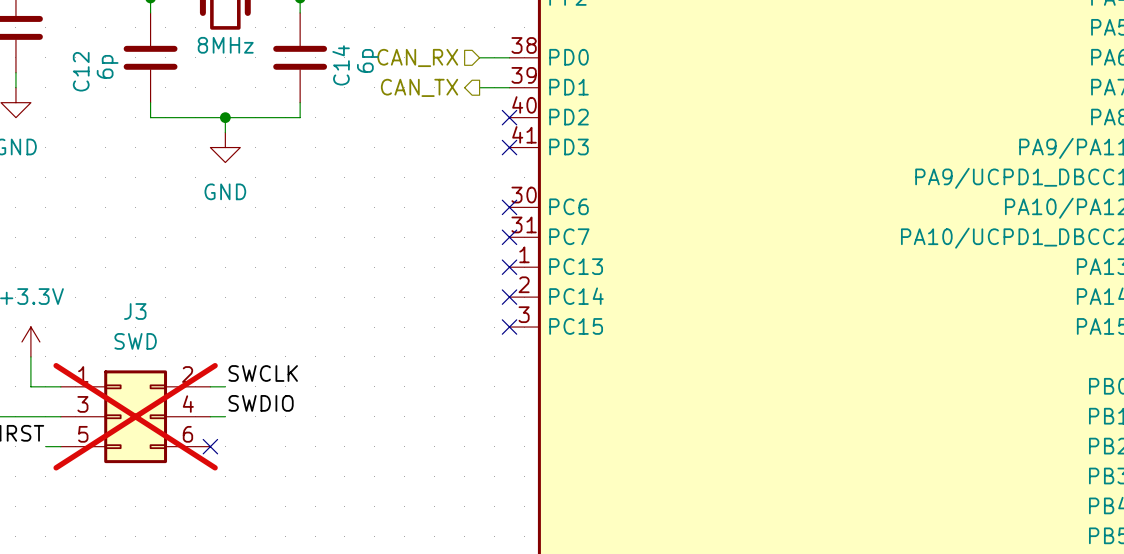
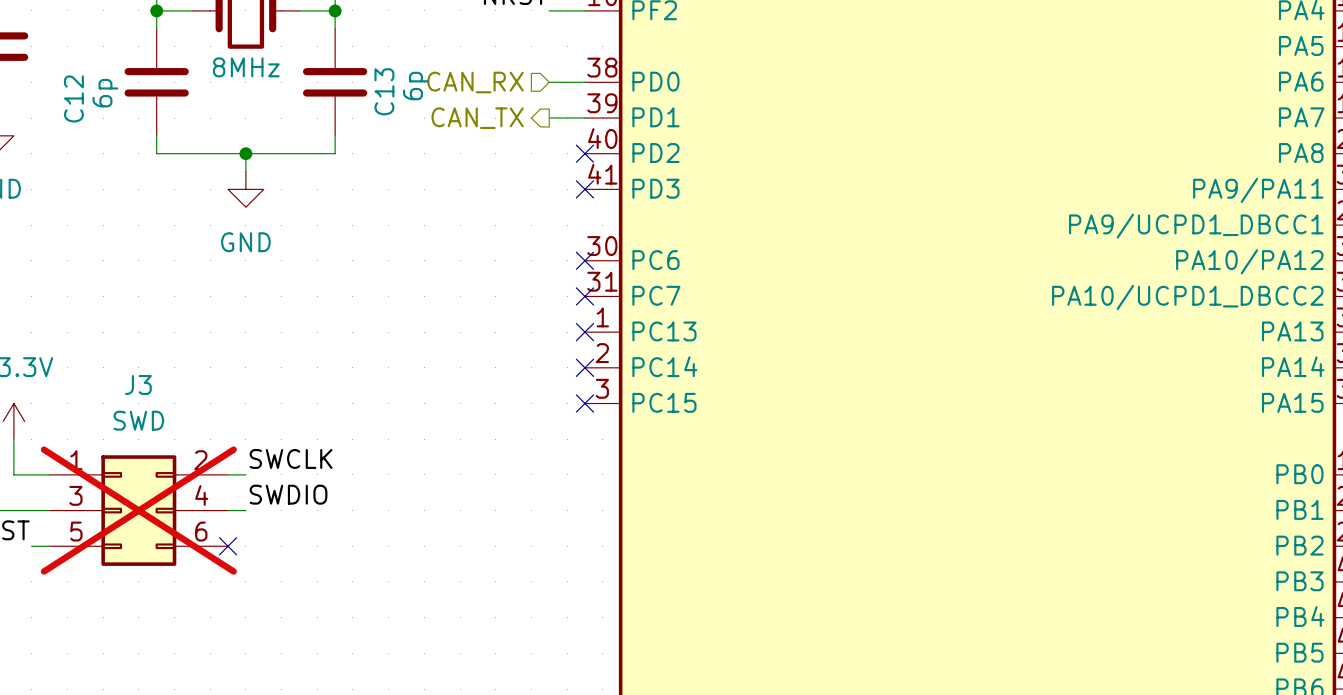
C14 name: C14 (341, 65) -> C13 (384, 91)

